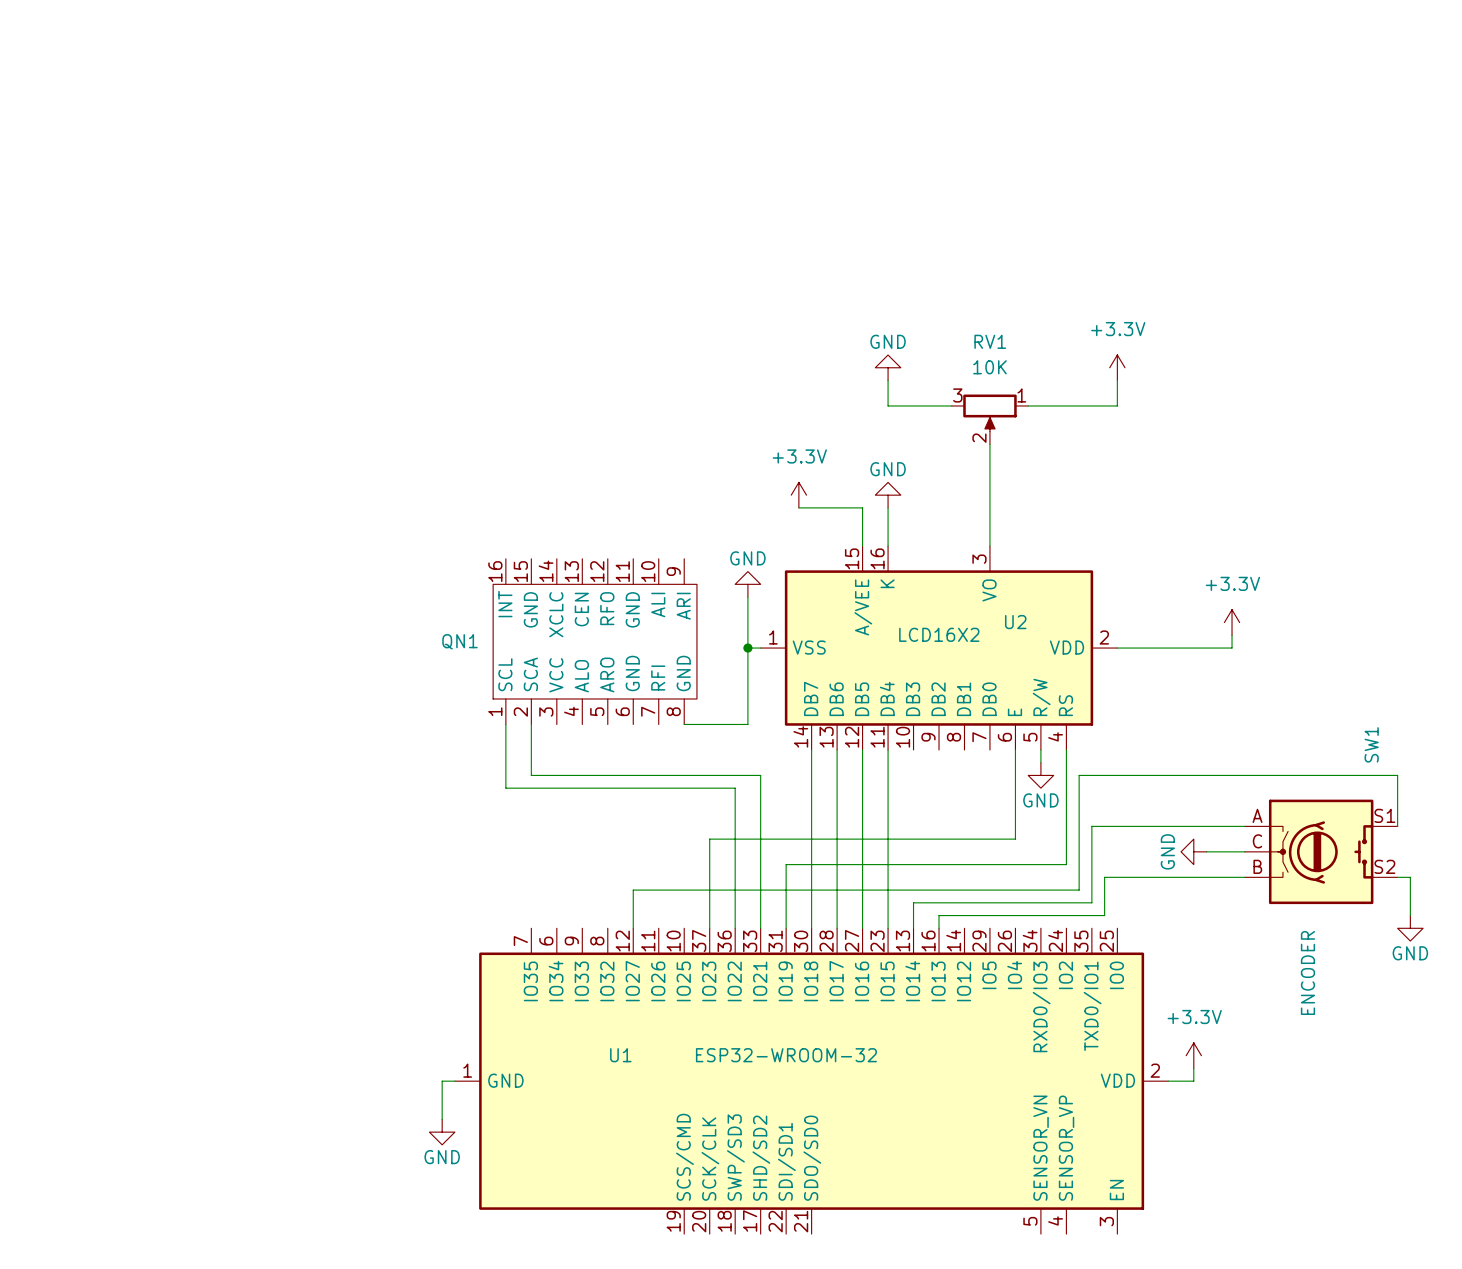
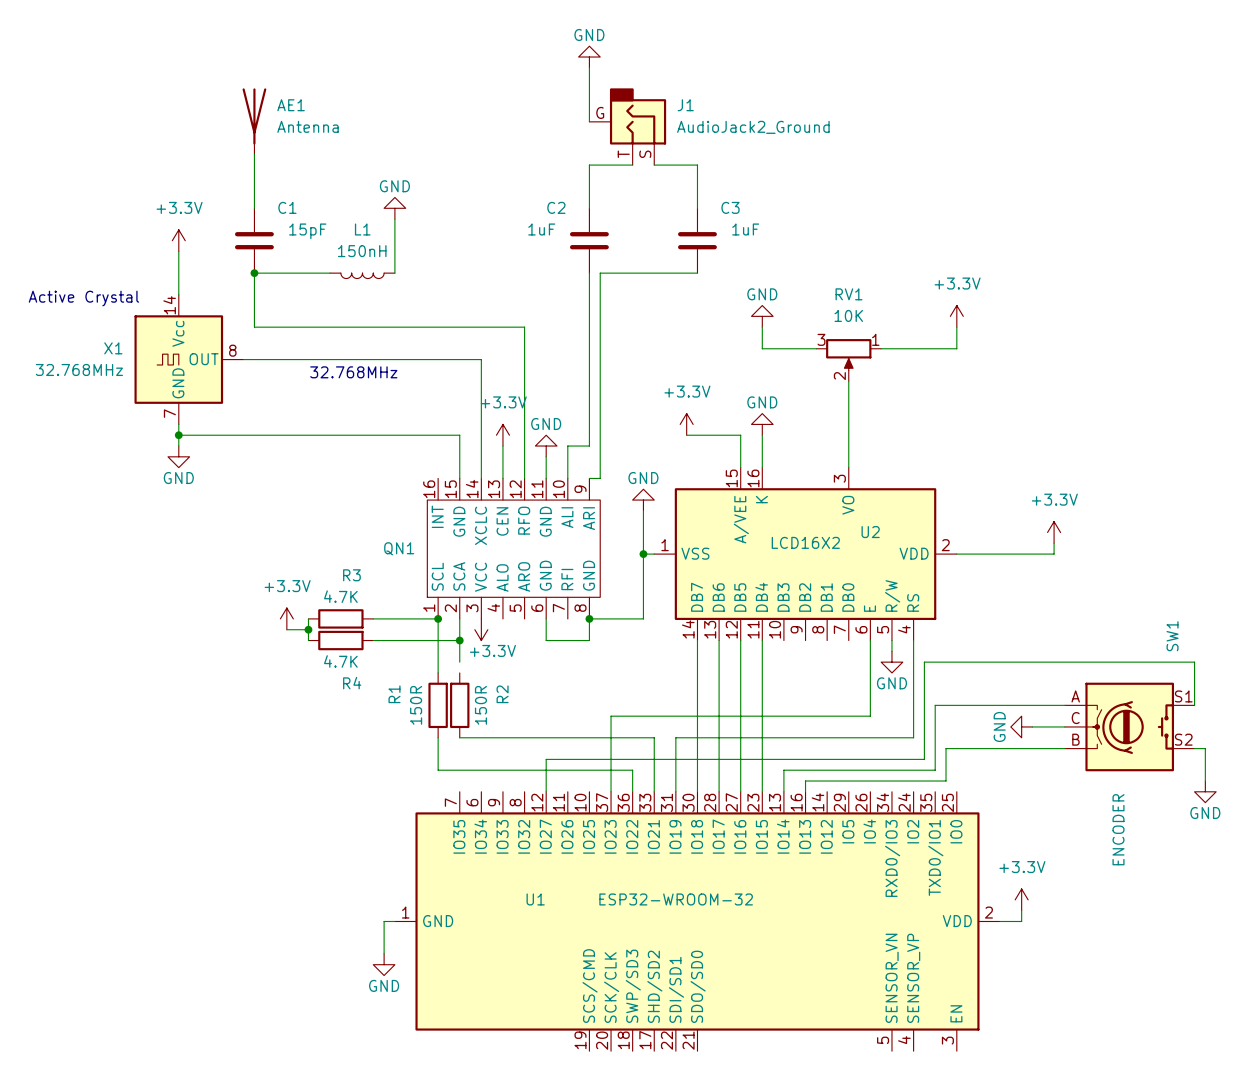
power symbol: none -> GND (589, 57)
wire: none -> (589, 67) (589, 121)
AE1: none -> Antenna (254, 121)
J1: none -> AudioJack2_Ground (627, 126)
wire: none -> (254, 154) (254, 208)
wire: none -> (632, 165) (589, 165) (589, 208)
wire: none -> (654, 165) (697, 165) (697, 208)
power symbol: none -> GND (394, 208)
wire: none -> (394, 219) (394, 273)
power symbol: none -> +3.3V (178, 240)
C1: none -> 15pF (254, 240)
C2: none -> 1uF (589, 240)
C3: none -> 1uF (697, 240)
wire: none -> (178, 251) (178, 294)
junction: none -> (254, 273)
wire: none -> (330, 273) (254, 273) (254, 327) (524, 327) (524, 478)
wire: none -> (589, 273) (589, 446) (567, 446) (567, 478)
wire: none -> (697, 273) (600, 273) (600, 478) (589, 478)
L1: none -> 150nH (362, 275)
text: none -> Active Crystal (83, 298)
X1: none -> 32.768MHz (189, 359)
wire: none -> (243, 359) (481, 359) (481, 478)
text: none -> 32.768MHz (353, 372)
wire: none -> (178, 424) (178, 446)
wire: none -> (178, 435) (459, 435) (459, 478)
junction: none -> (178, 435)
power symbol: none -> +3.3V (502, 435)
wire: none -> (502, 446) (502, 478)
power symbol: none -> GND (546, 446)
power symbol: none -> GND (178, 456)
wire: none -> (546, 456) (546, 478)
power symbol: none -> +3.3V (286, 618)
wire: none -> (308, 618) (308, 640)
R3: none -> 4.7K (340, 618)
wire: none -> (373, 618) (438, 618)
junction: none -> (438, 618)
wire: none -> (546, 618) (546, 640) (589, 640) (589, 618)
junction: none -> (589, 618)
wire: none -> (286, 629) (308, 629)
junction: none -> (308, 629)
power symbol: none -> +3.3V (481, 629)
R4: none -> 4.7K (340, 640)
wire: none -> (373, 640) (459, 640)
junction: none -> (459, 640)
wire: (531, 775) (760, 775) (760, 864) -> (459, 737) (654, 737)
wire: (505, 788) (735, 788) (735, 902) -> (438, 737) (438, 770) (632, 770)
R1: none -> 150R (438, 705)
R2: none -> 150R (459, 705)

